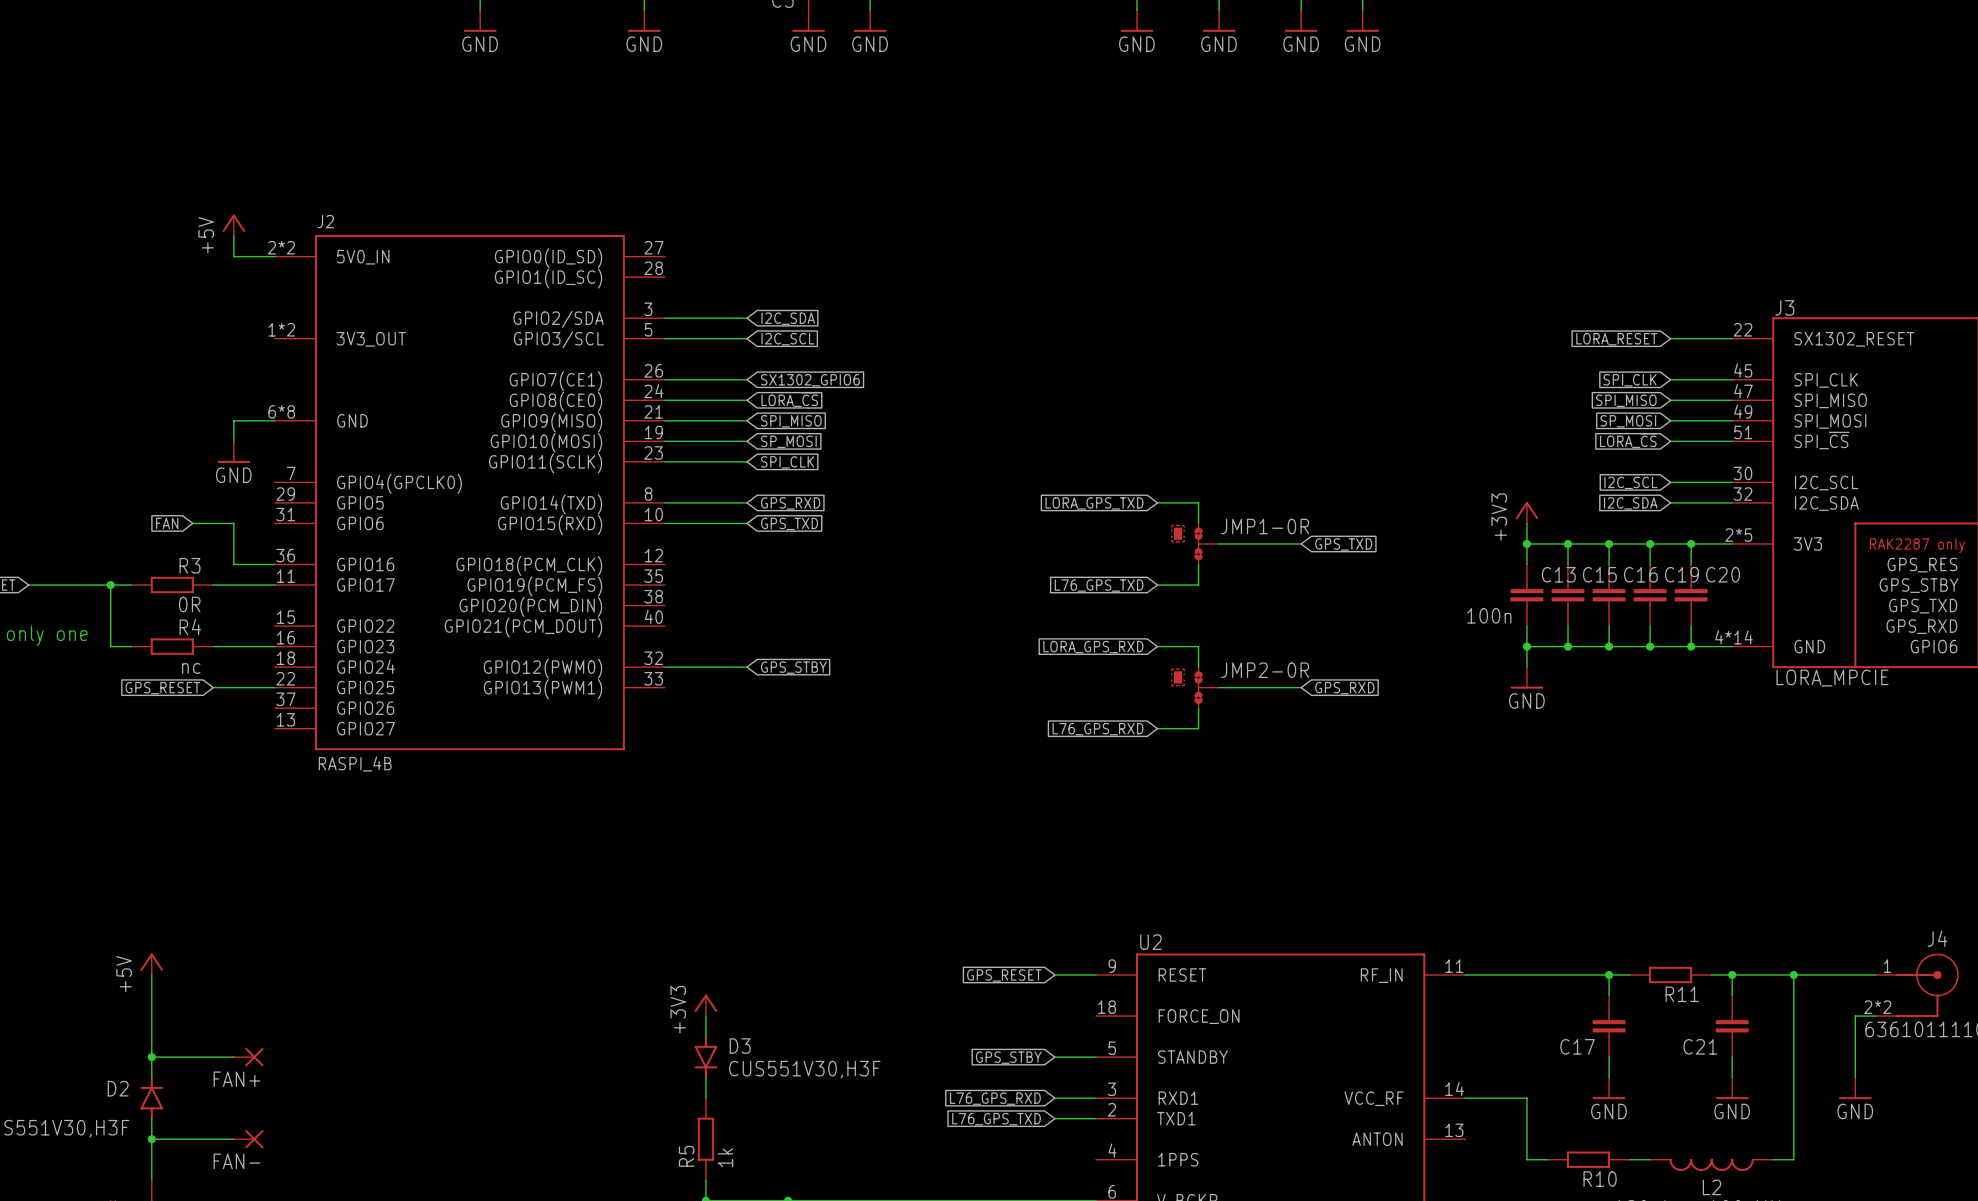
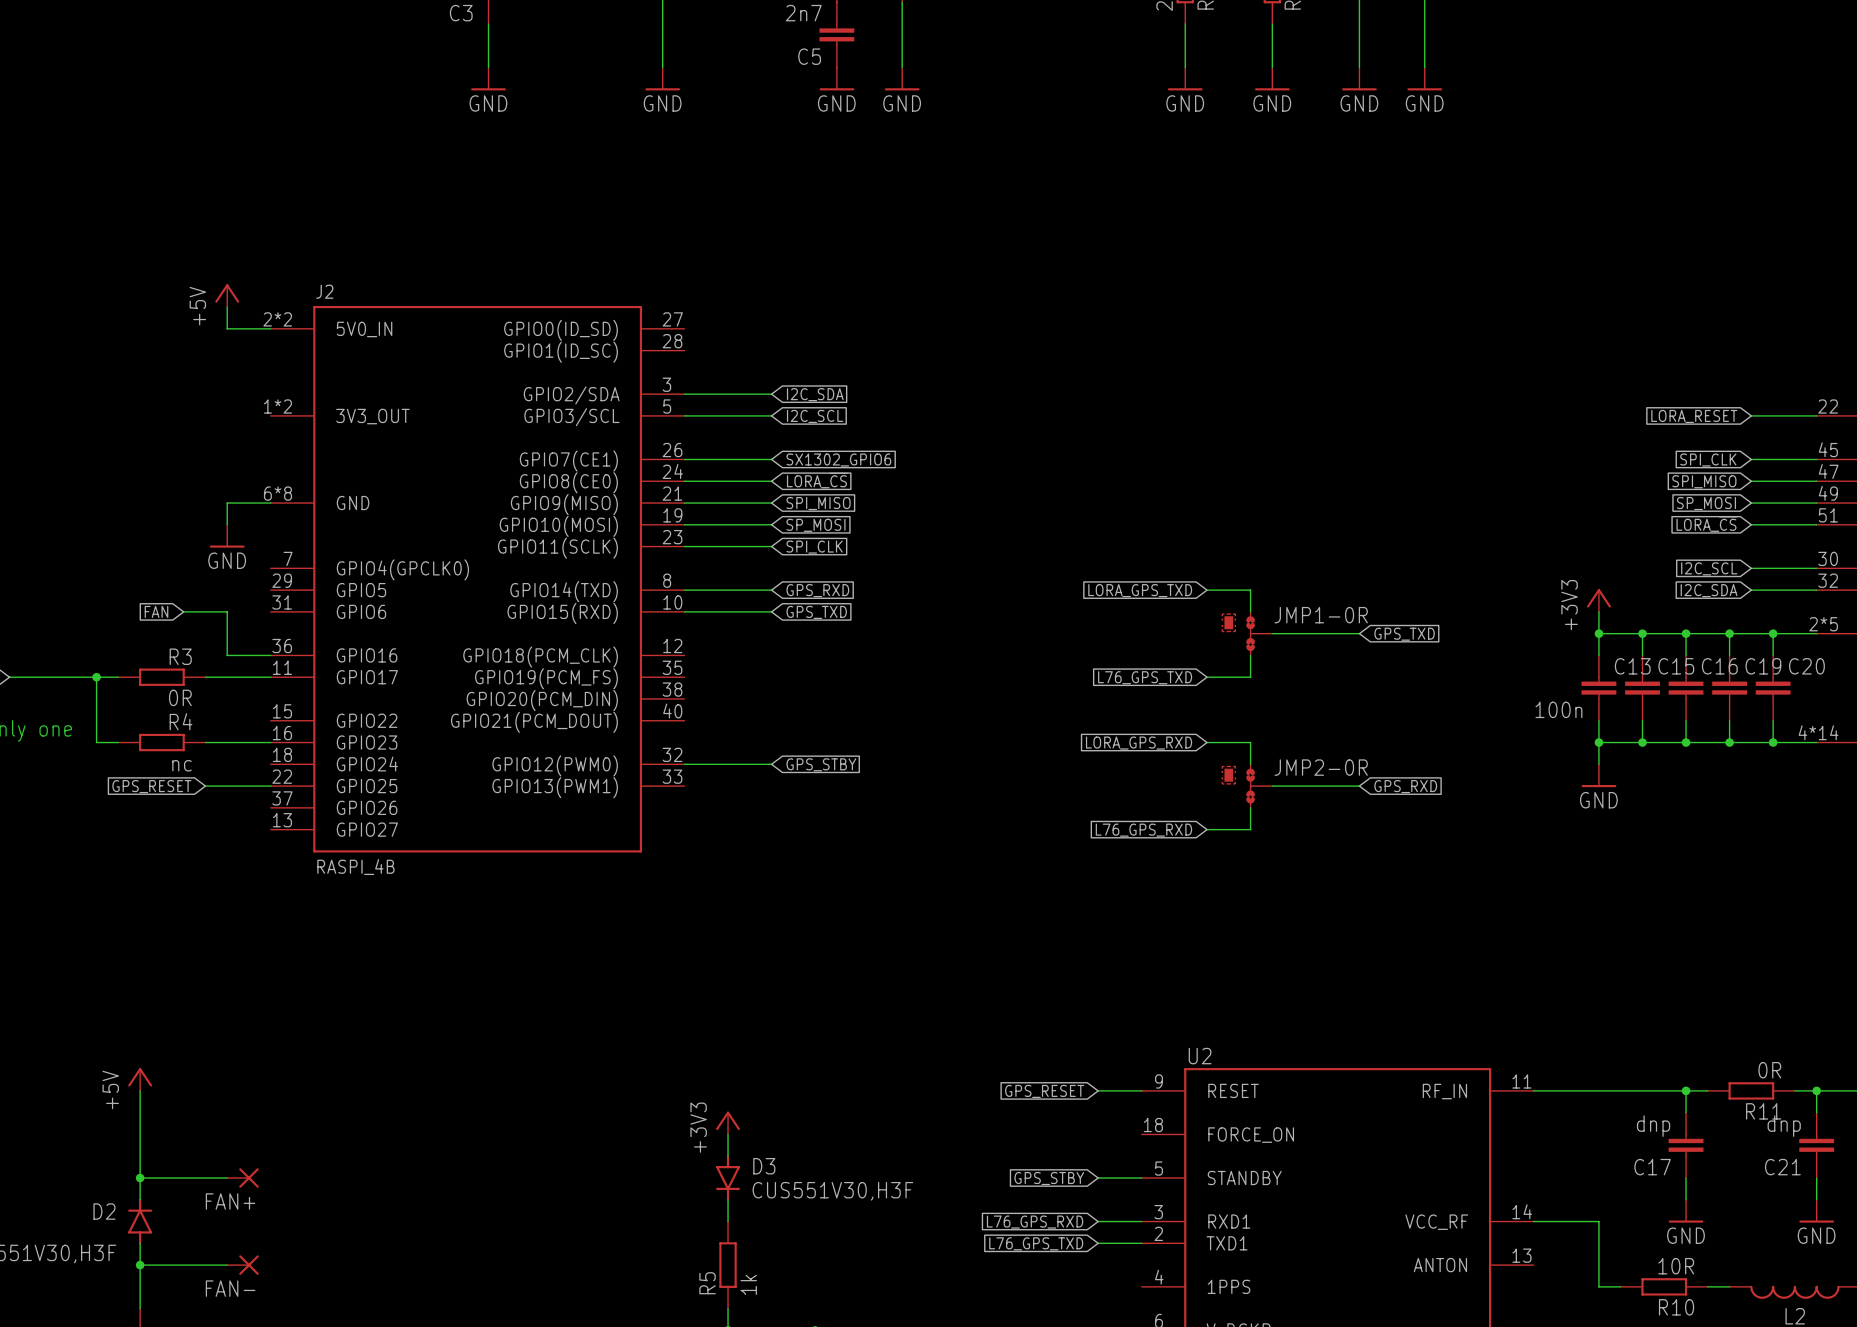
R11 value: none -> 0R (1769, 1070)
C17 value: none -> dnp (1653, 1126)
C21 value: none -> dnp (1784, 1126)
R10 value: none -> 10R (1676, 1266)

